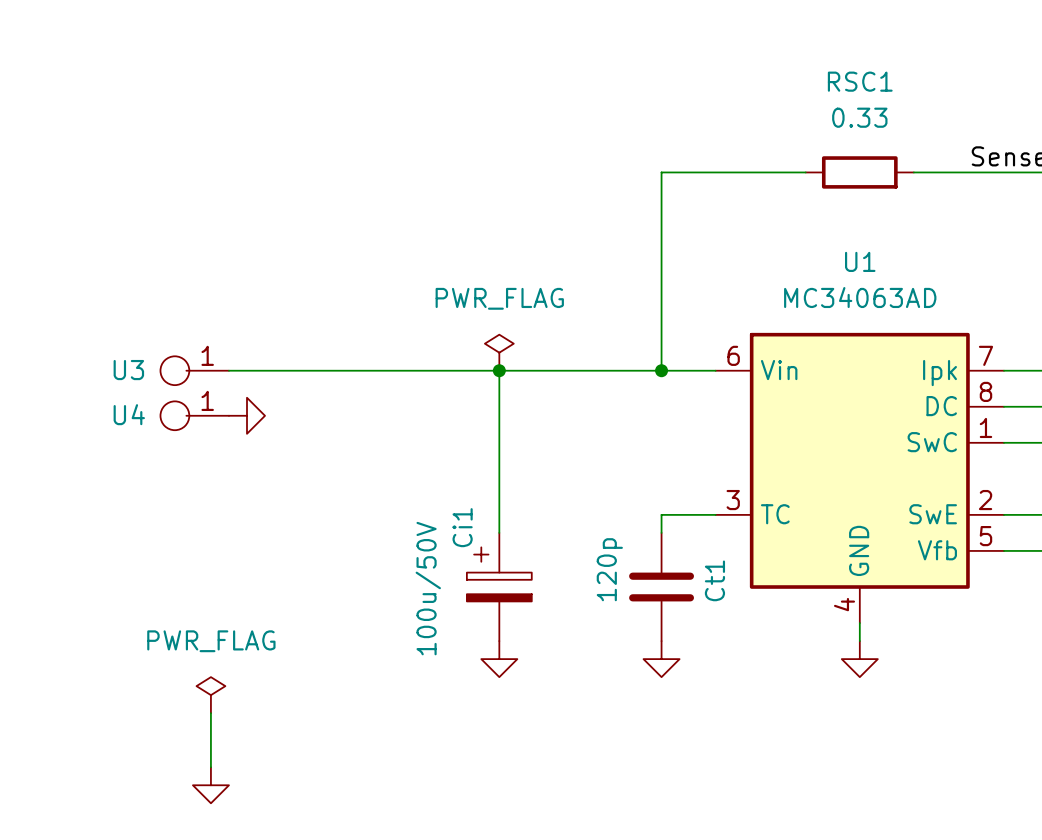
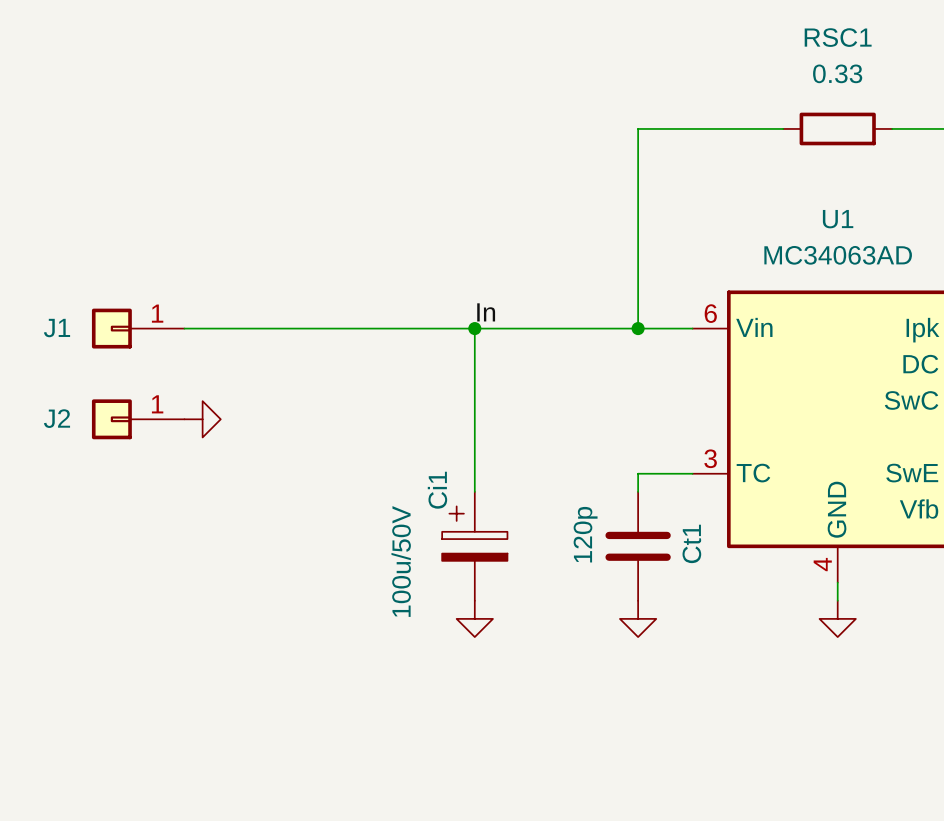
power symbol: PWR_FLAG (499, 352) -> none
label: none -> In (486, 312)
J1: none -> (138, 328)
U3: (194, 370) -> none
U4: (194, 415) -> none
power symbol position: (247, 415) -> (202, 419)
J2: none -> (138, 419)
power symbol: PWR_FLAG (210, 695) -> none
wire: (210, 713) (210, 767) -> none
power symbol: (210, 785) -> none

